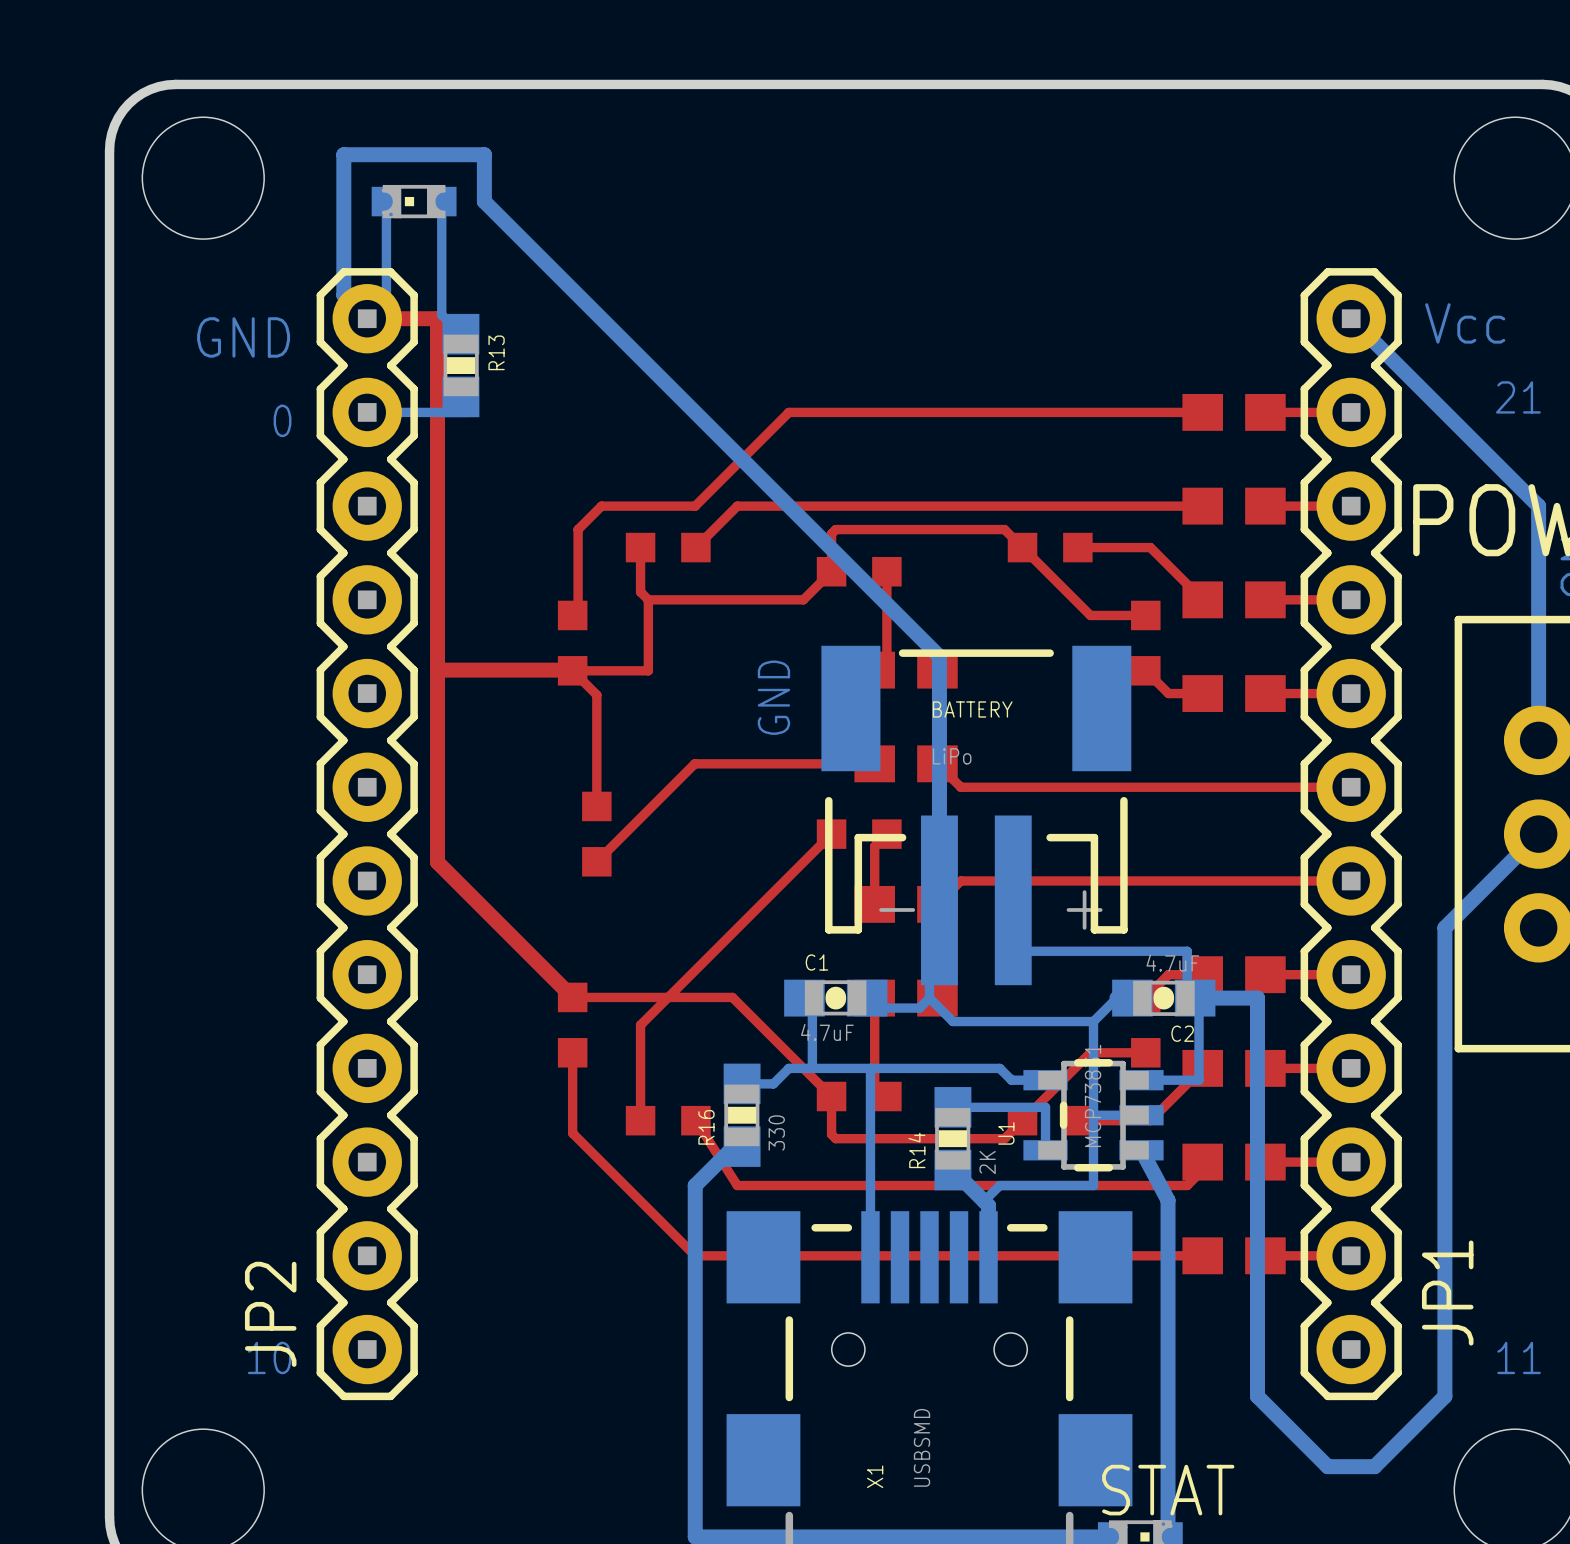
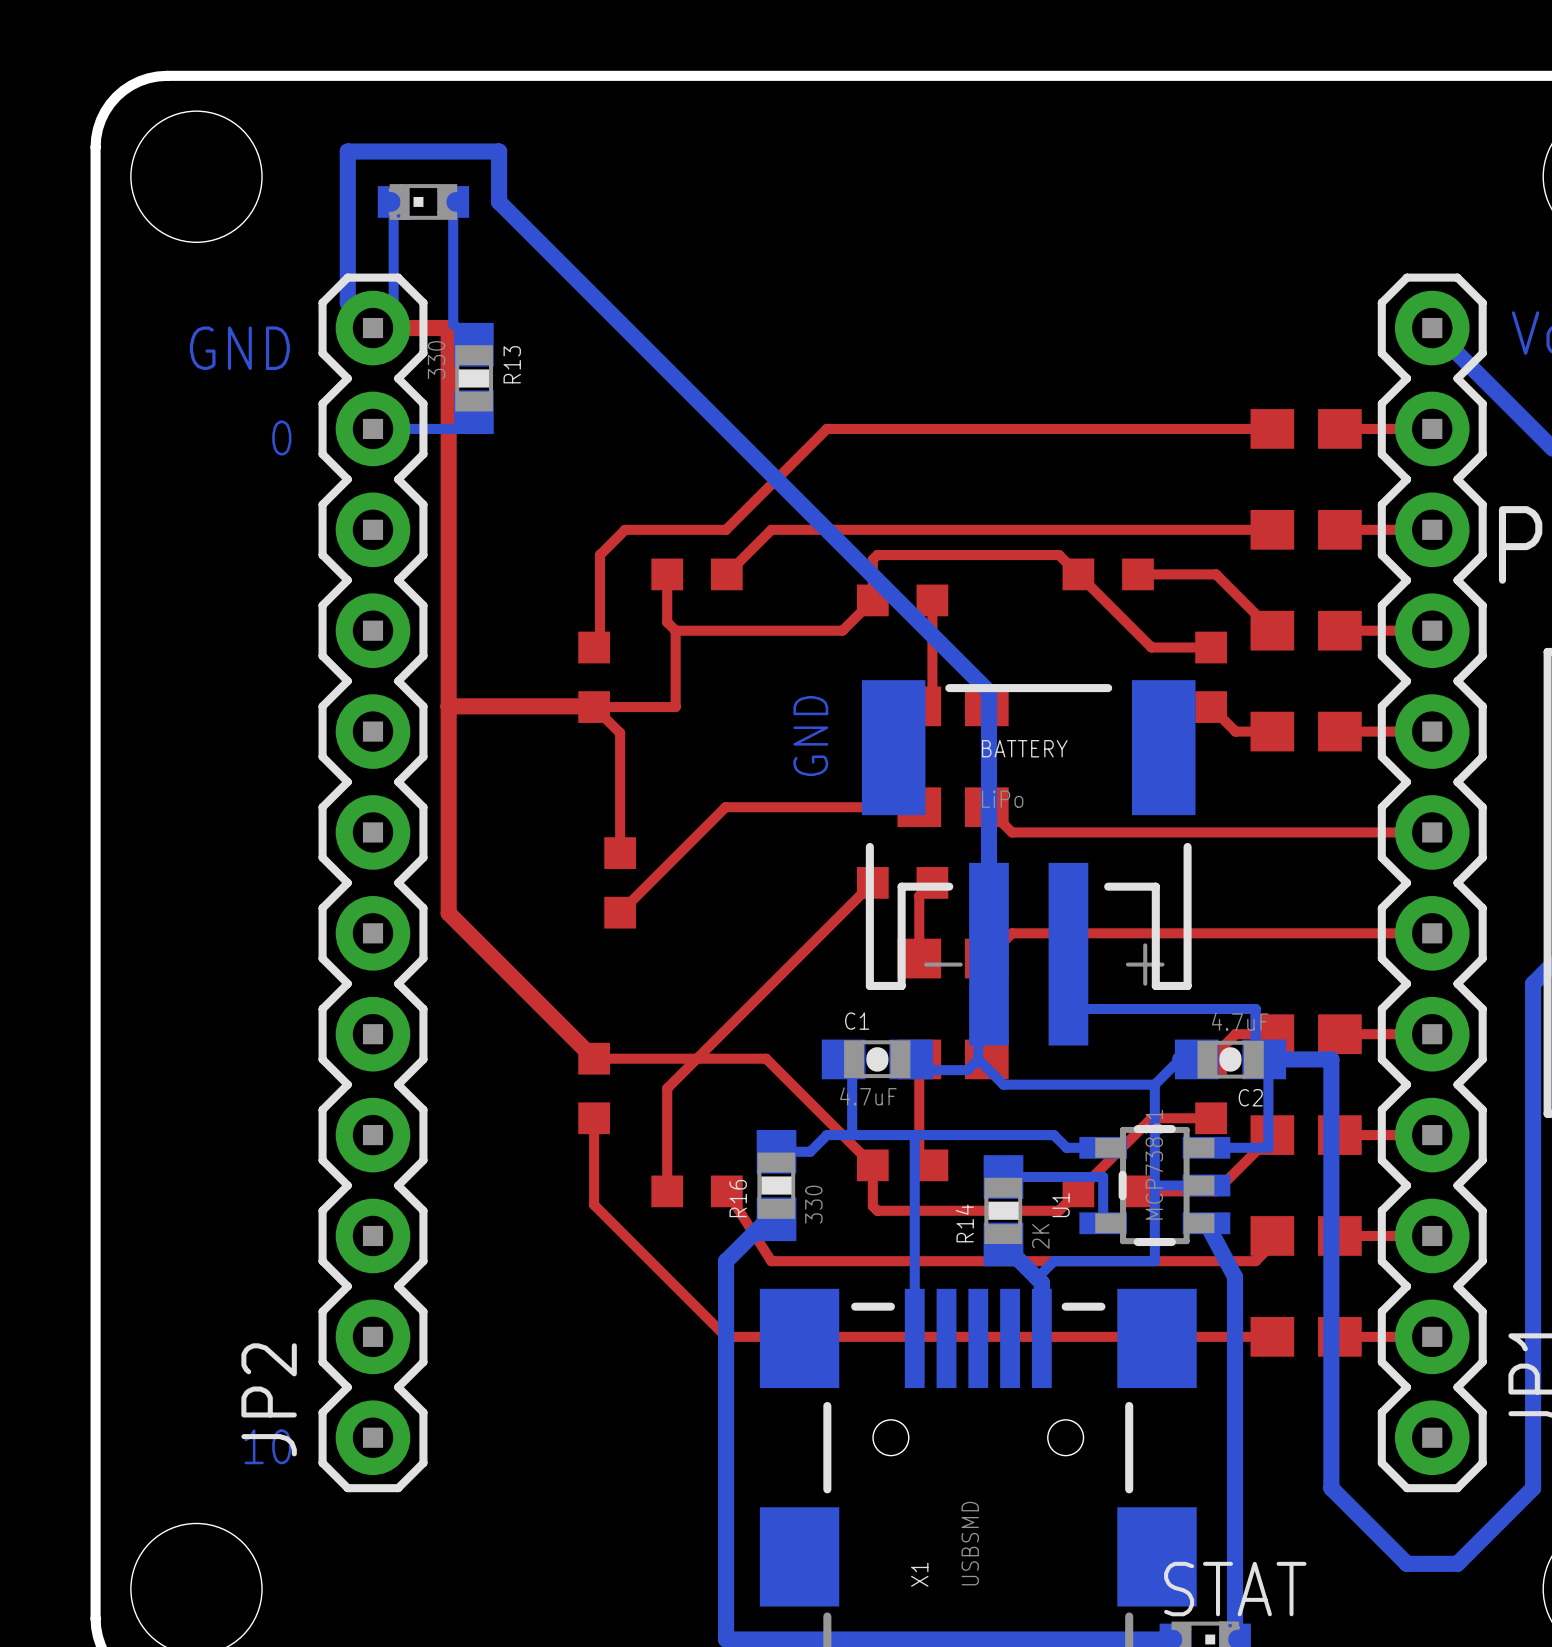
R13 value: none -> 330 (436, 360)

